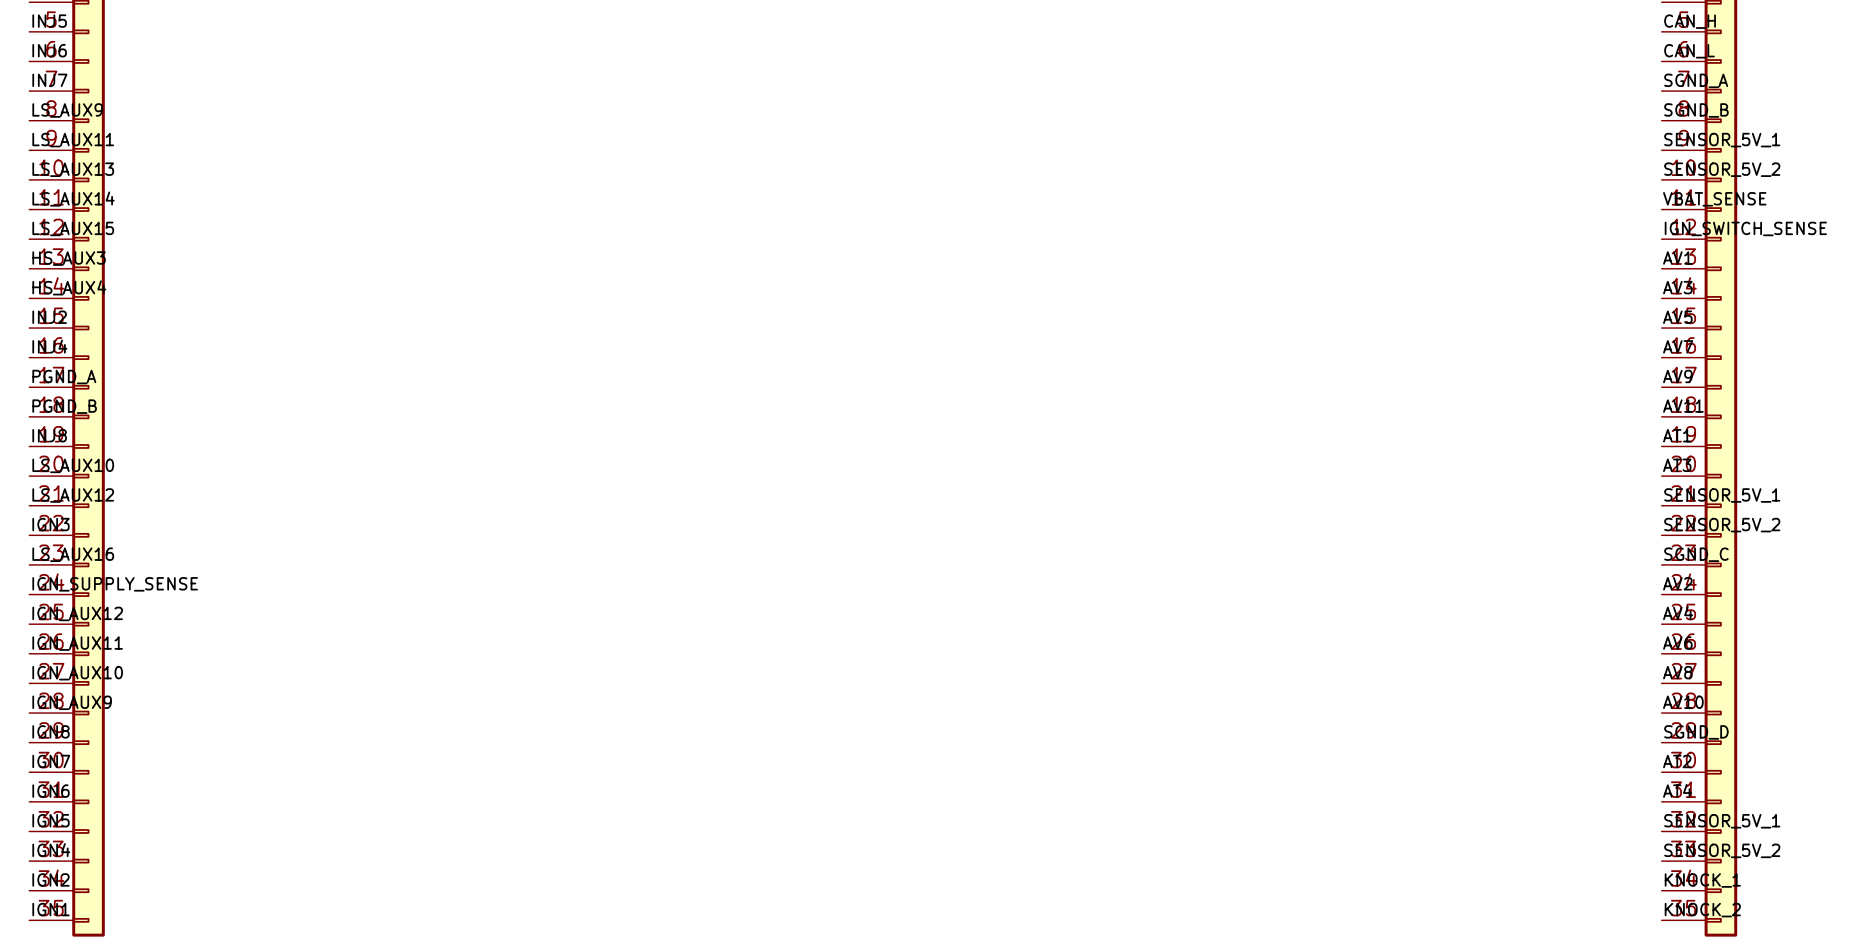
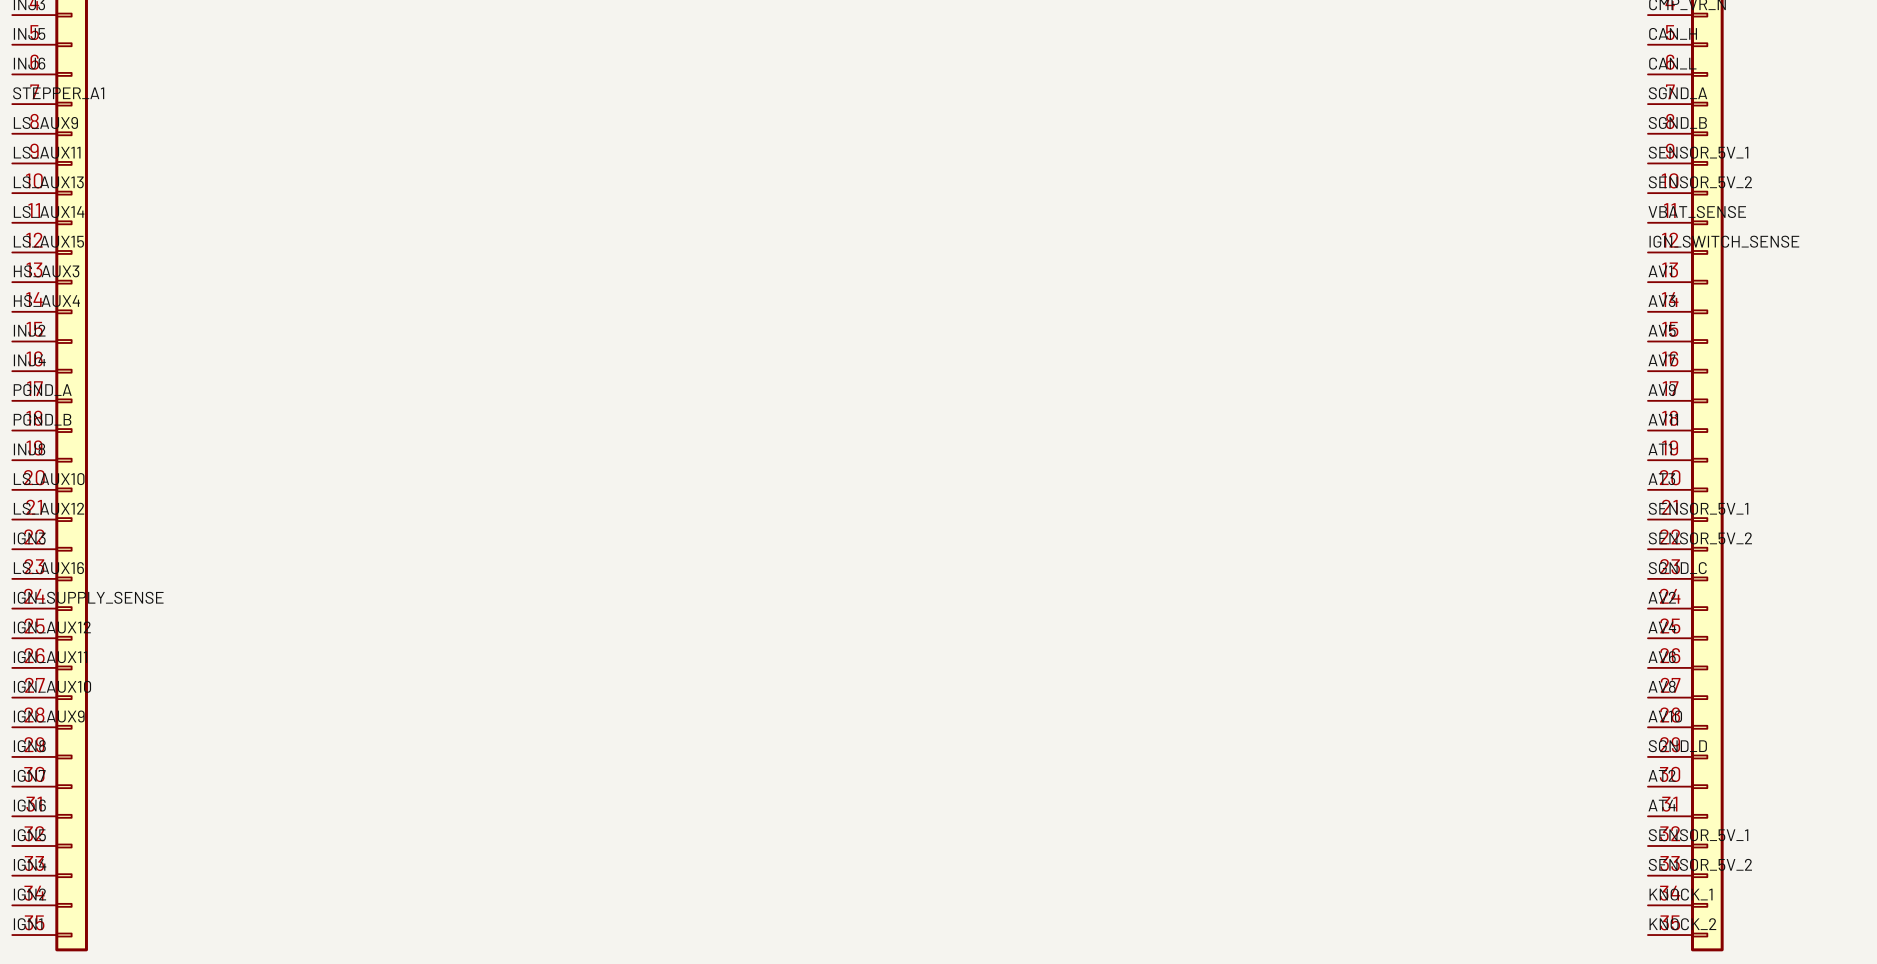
label: INJ7 (49, 80) -> STEPPER_A1 (58, 93)

